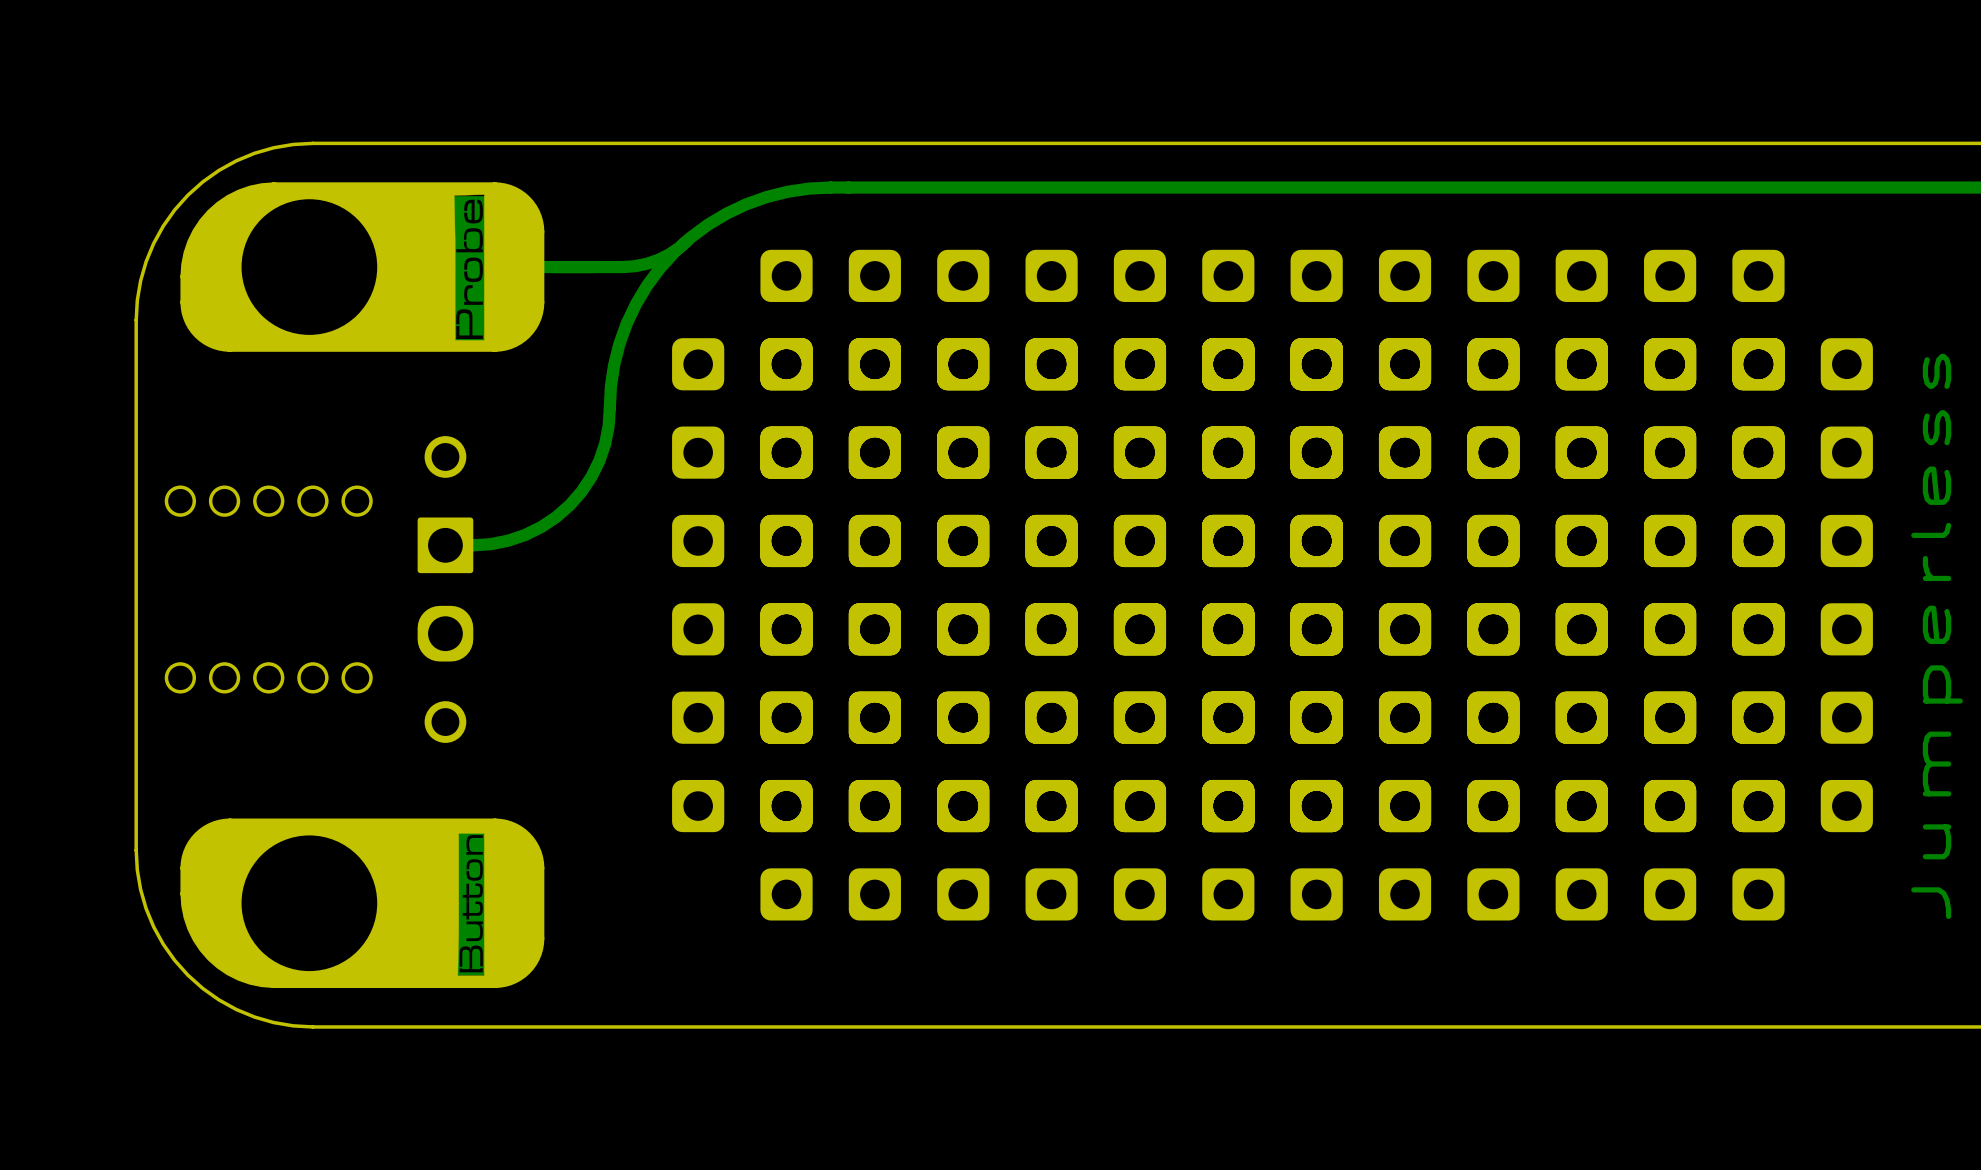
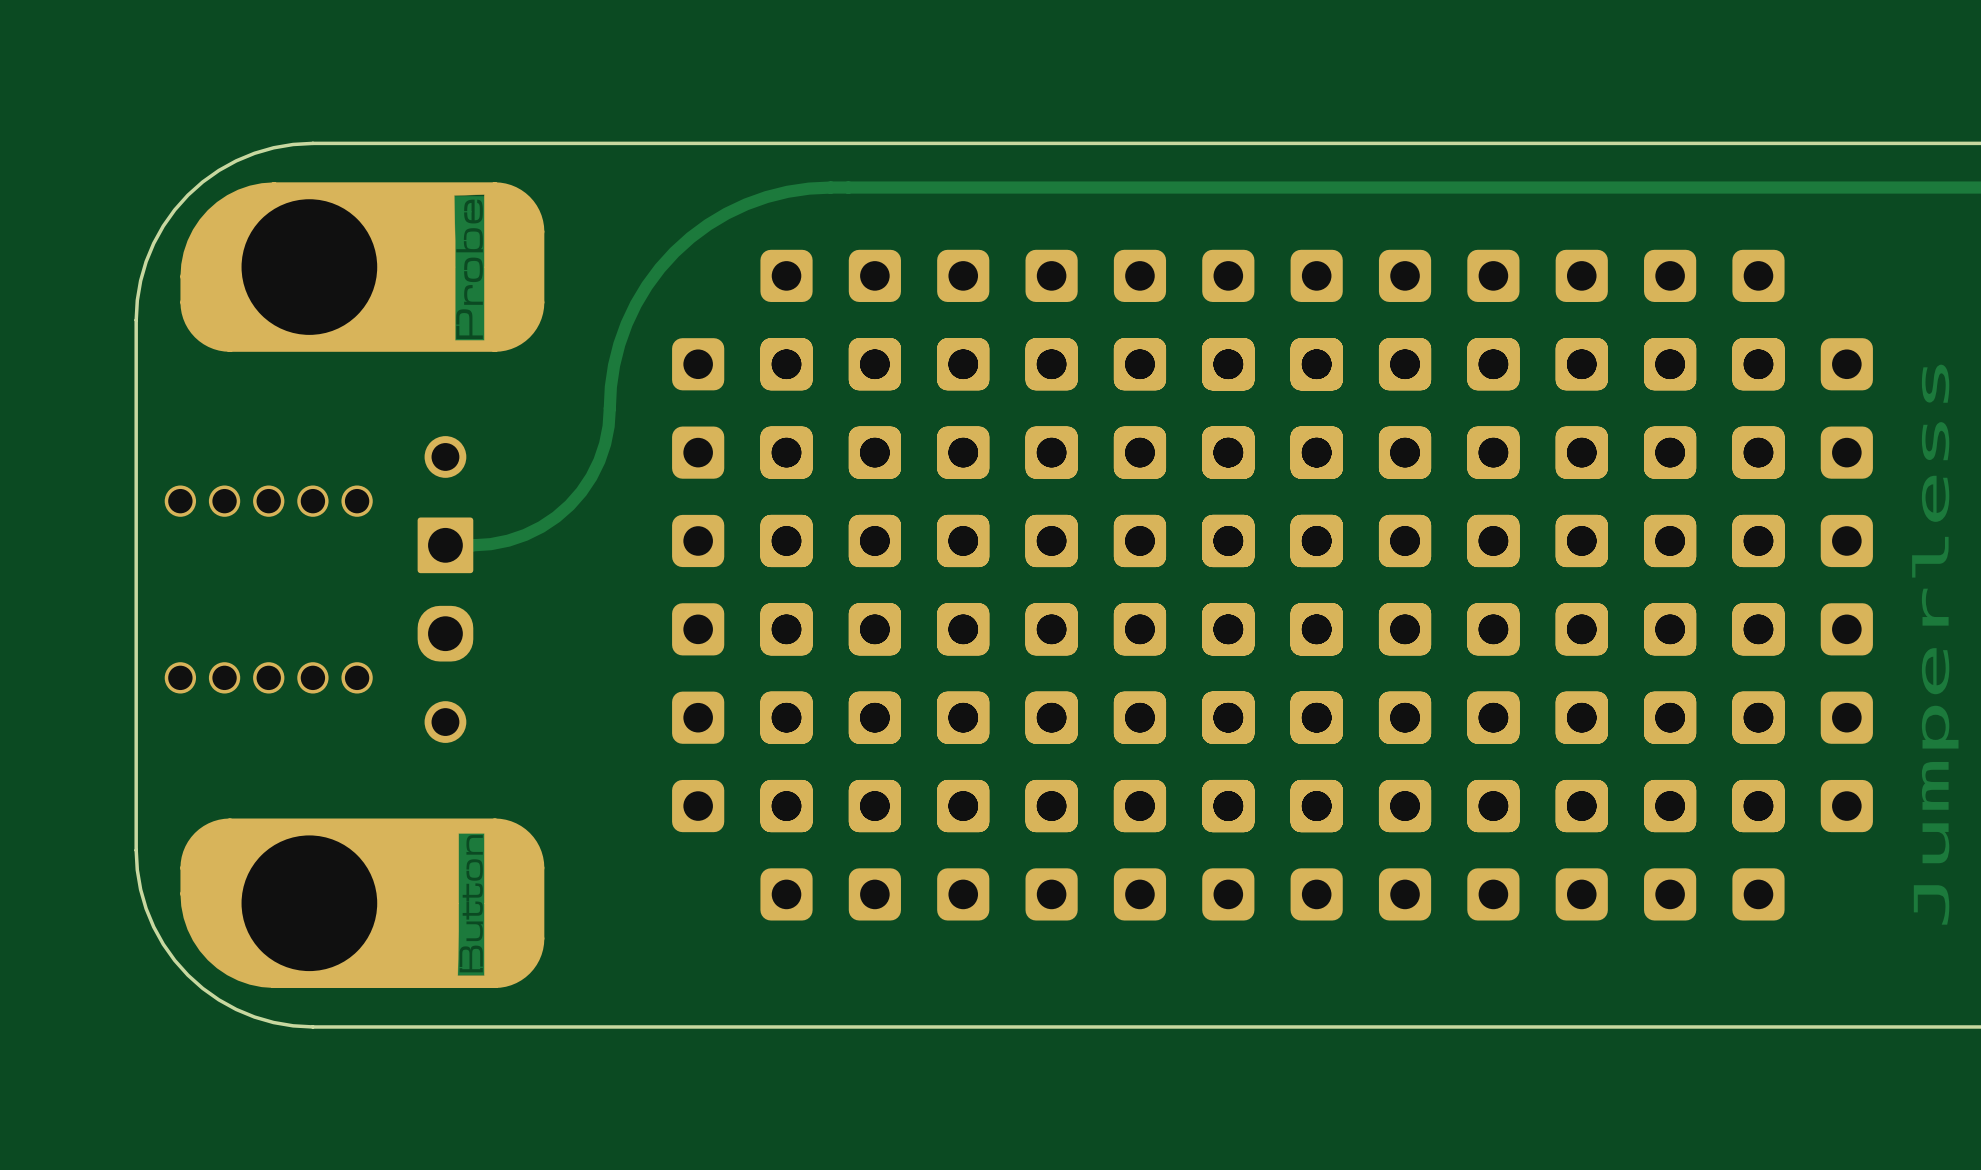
track: (688, 239) (679, 247) (658, 259) (634, 266) (622, 267) -> none
track: (623, 267) (523, 267) -> none

